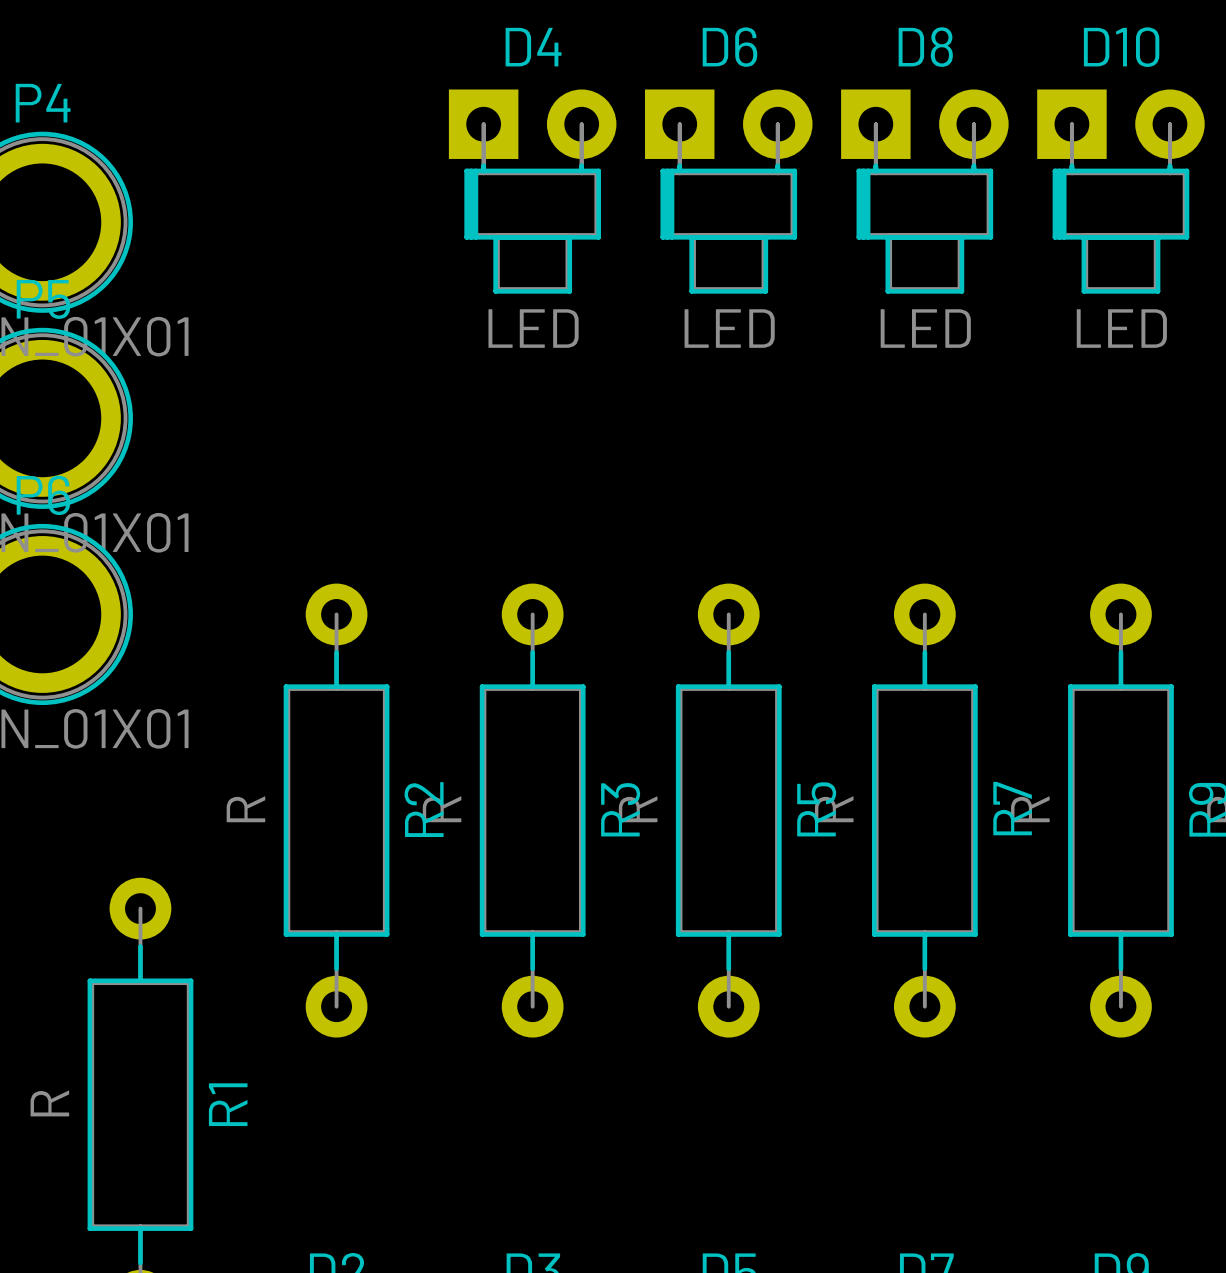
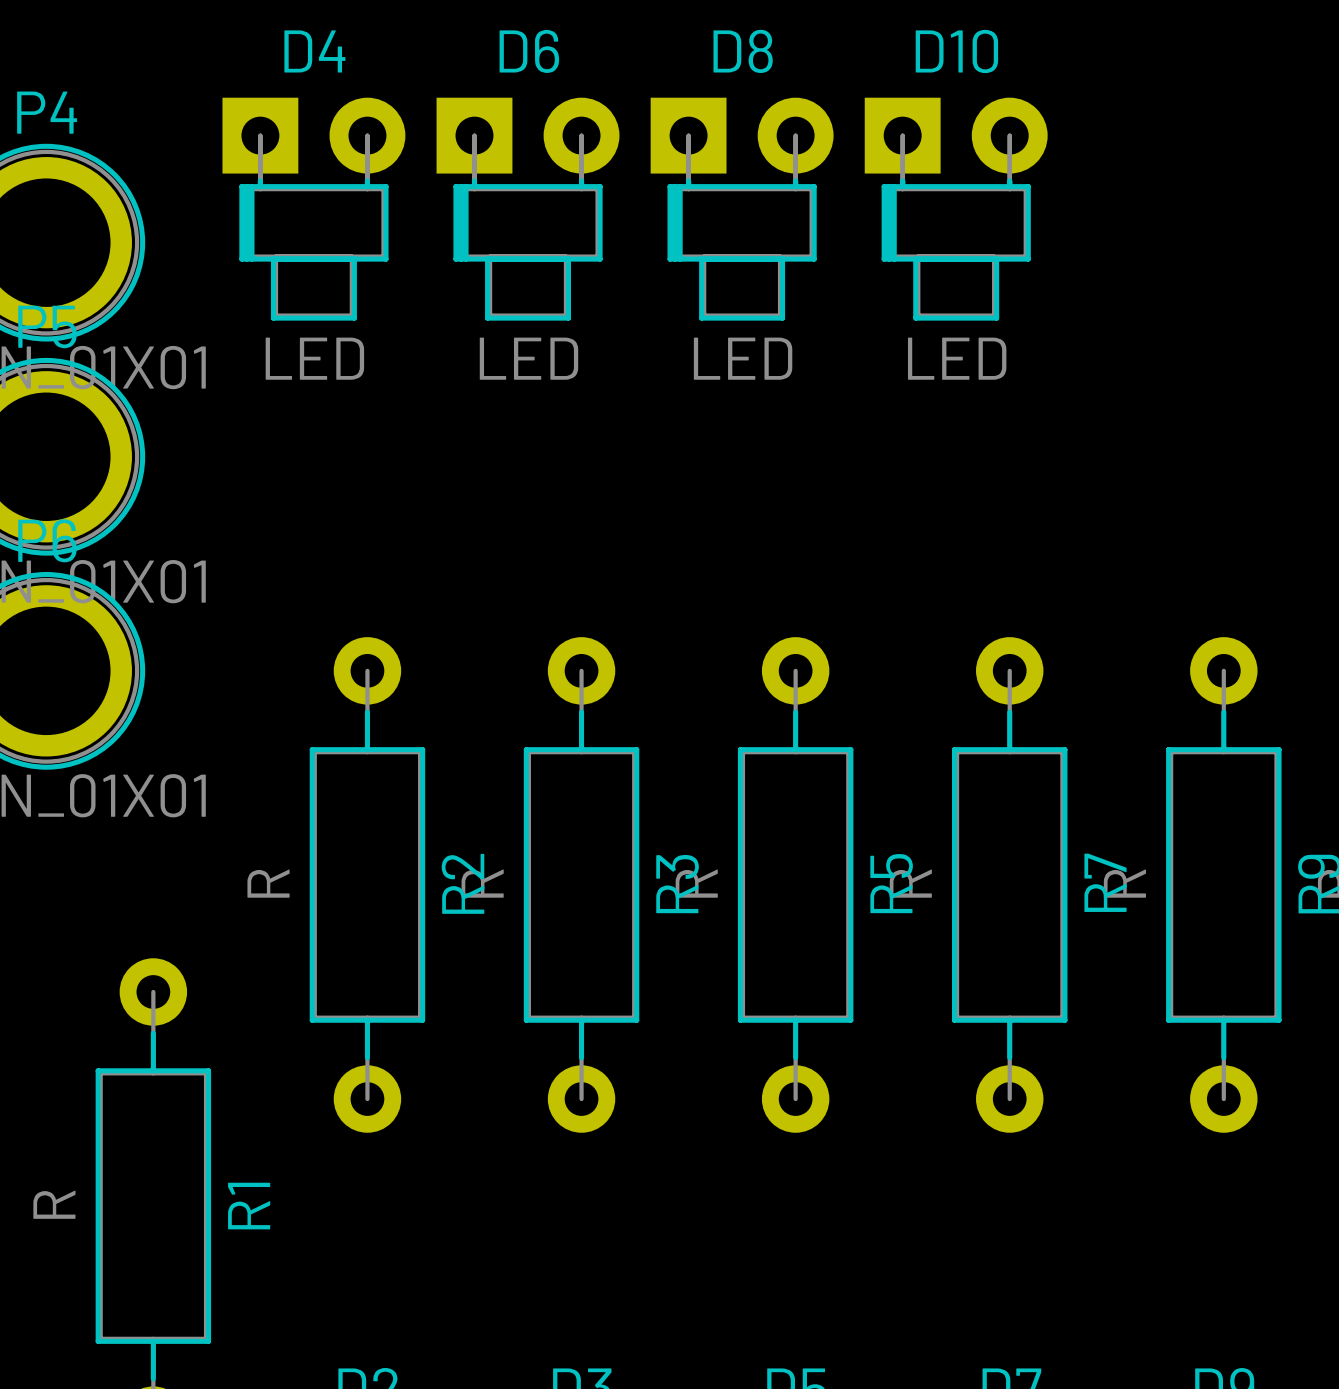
D4 position: (532, 191) -> (313, 209)
D6 position: (728, 191) -> (528, 209)
D8 position: (924, 191) -> (742, 209)
D10 position: (1120, 191) -> (956, 209)

